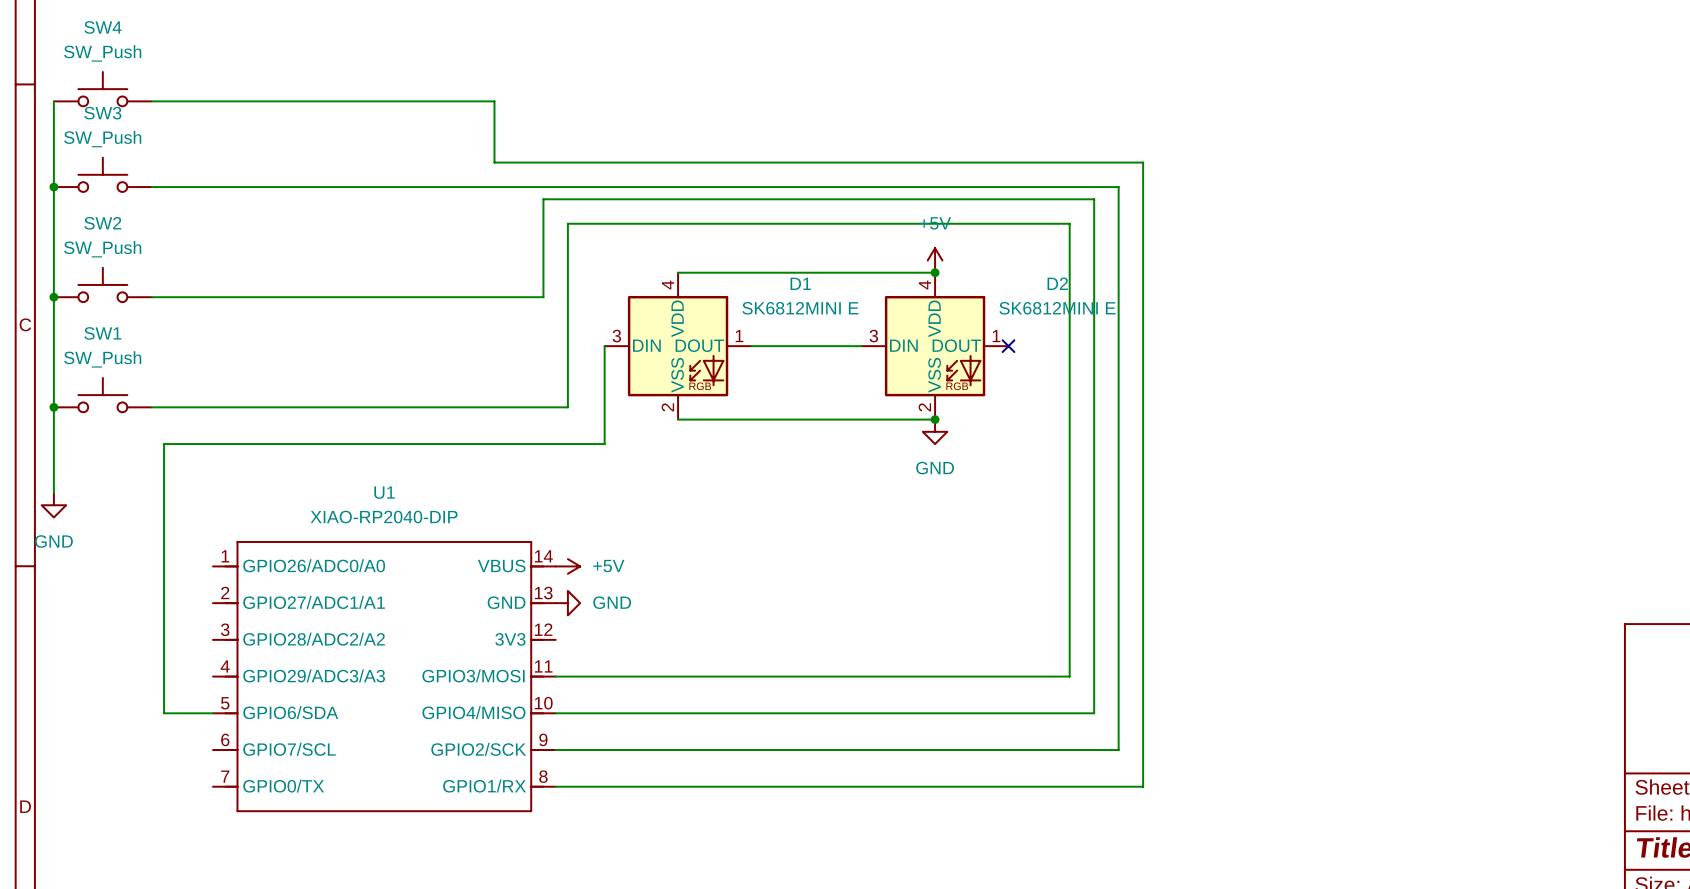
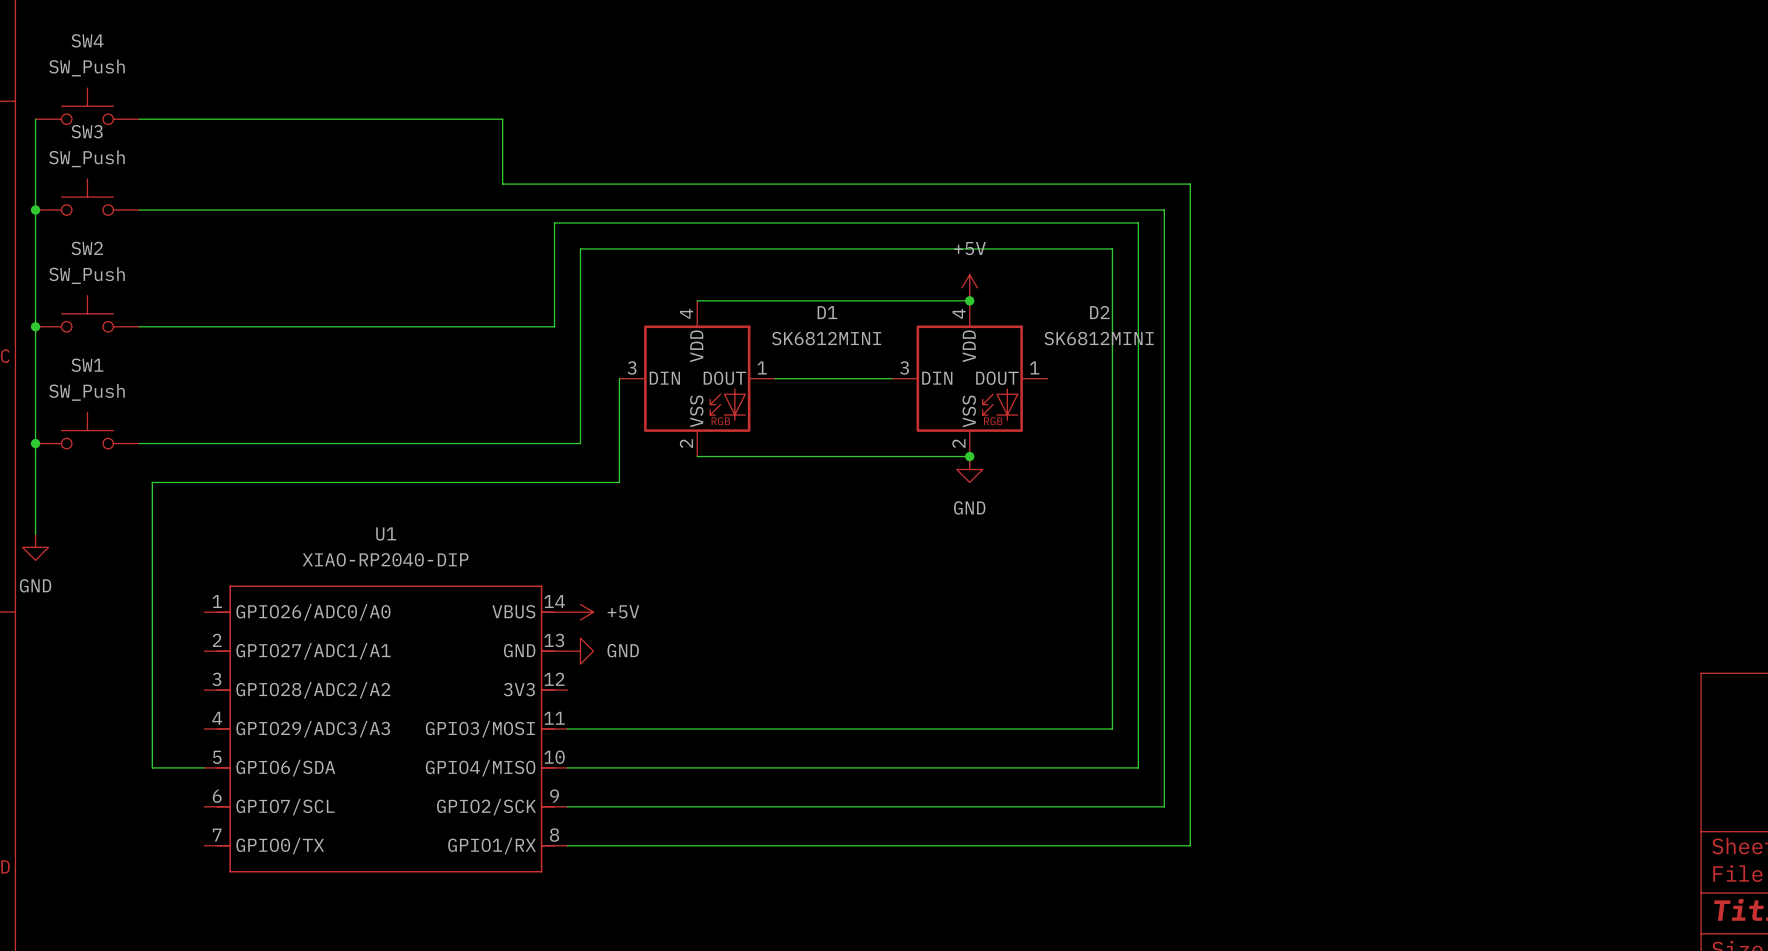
D1 value: SK6812MINI E (800, 308) -> SK6812MINI (826, 338)
D2 value: SK6812MINI E (1057, 308) -> SK6812MINI (1099, 338)
no-connect mark: (1008, 346) -> none

